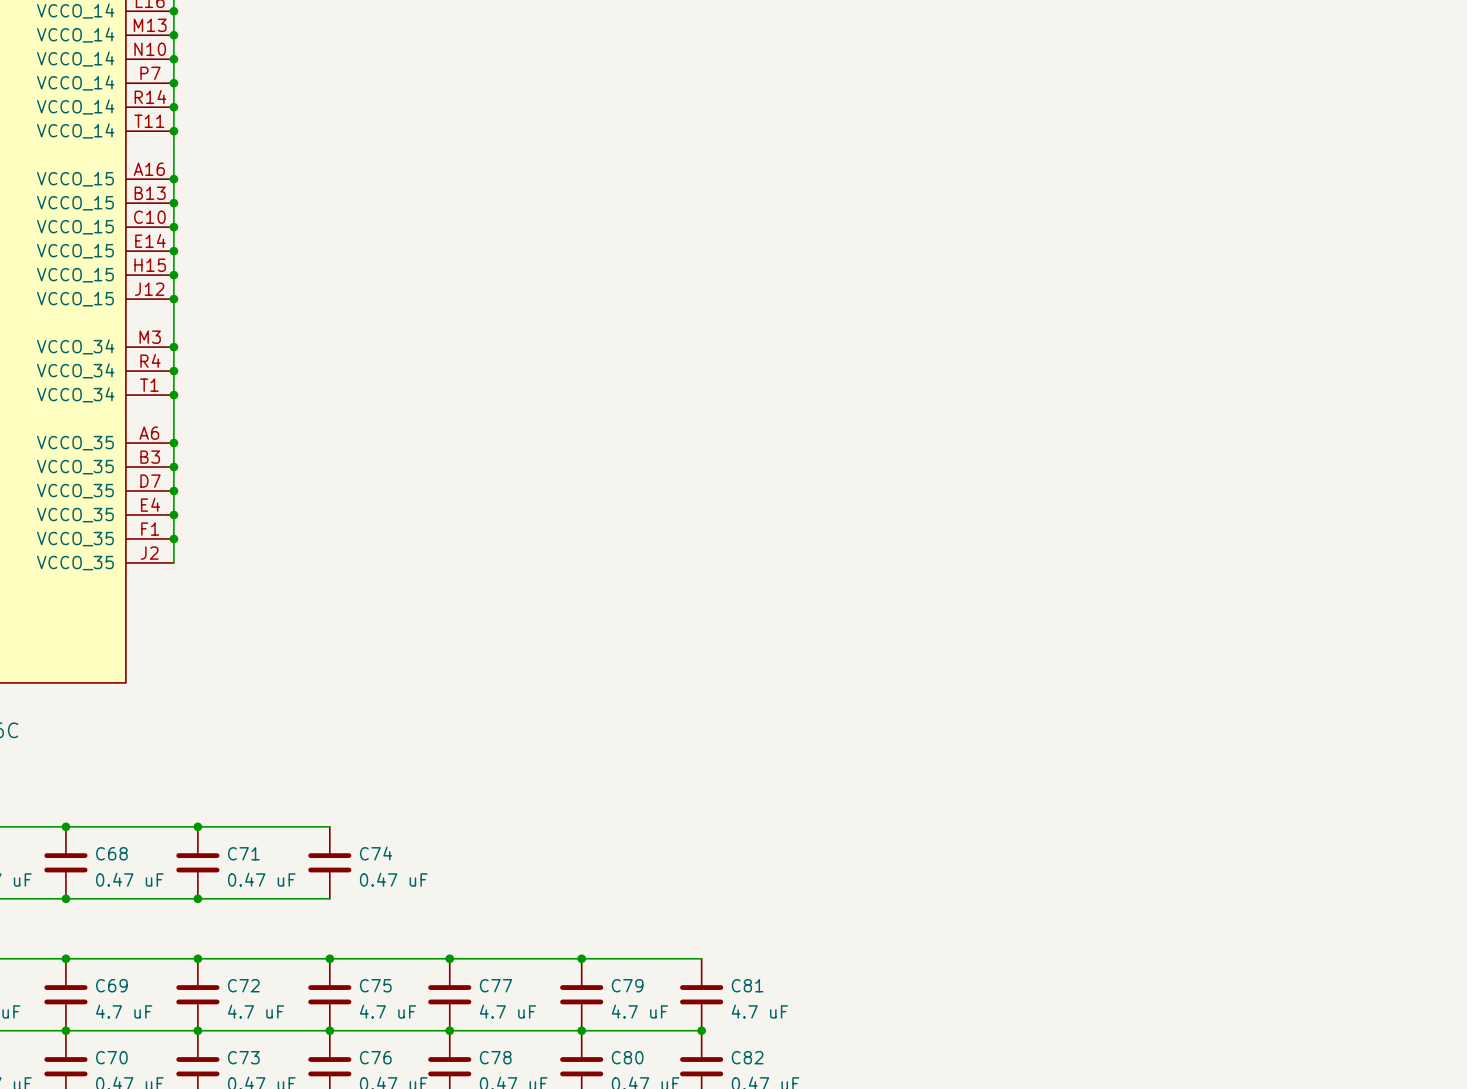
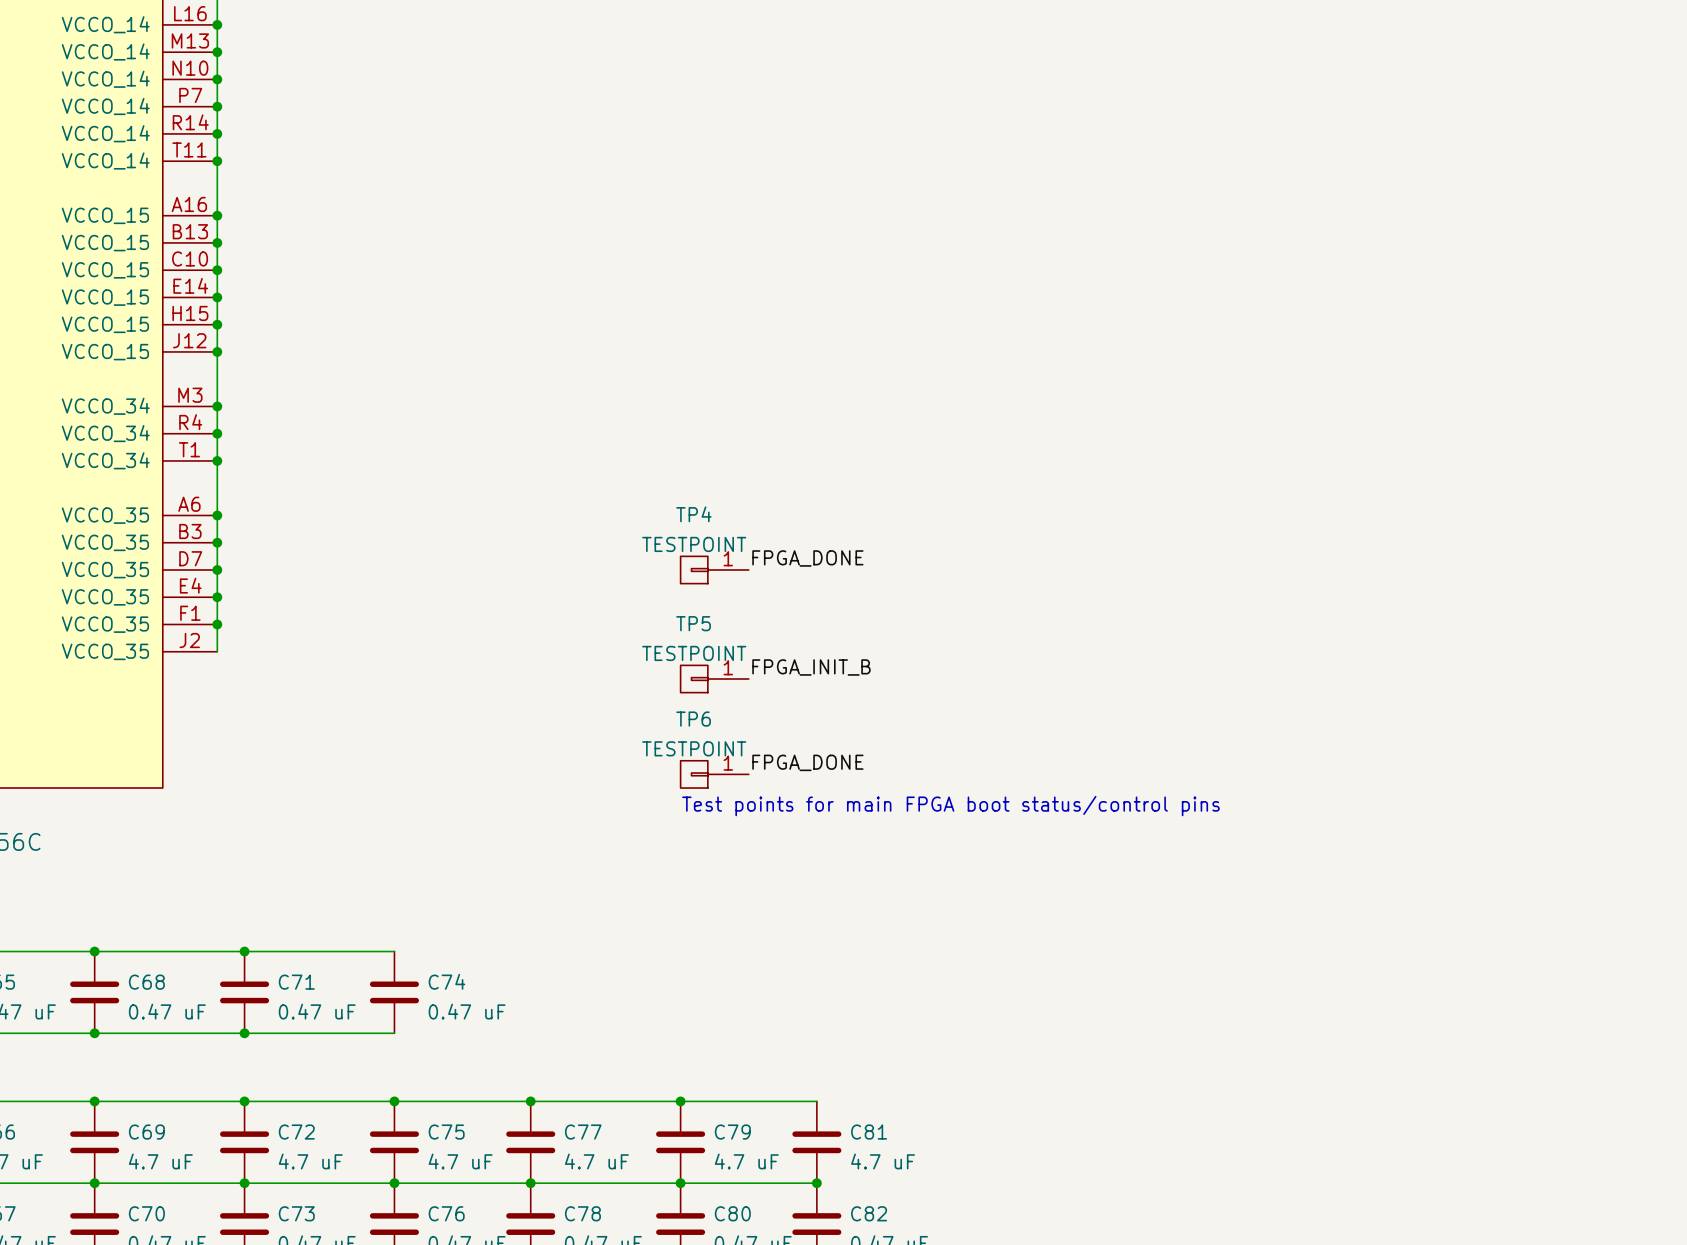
label: none -> FPGA_DONE (807, 558)
TP4: none -> TESTPOINT (714, 569)
label: none -> FPGA_INIT_B (811, 667)
TP5: none -> TESTPOINT (714, 679)
label: none -> FPGA_DONE (807, 762)
TP6: none -> TESTPOINT (714, 774)
text: none -> Test points for main FPGA boot status/control pins (950, 806)

